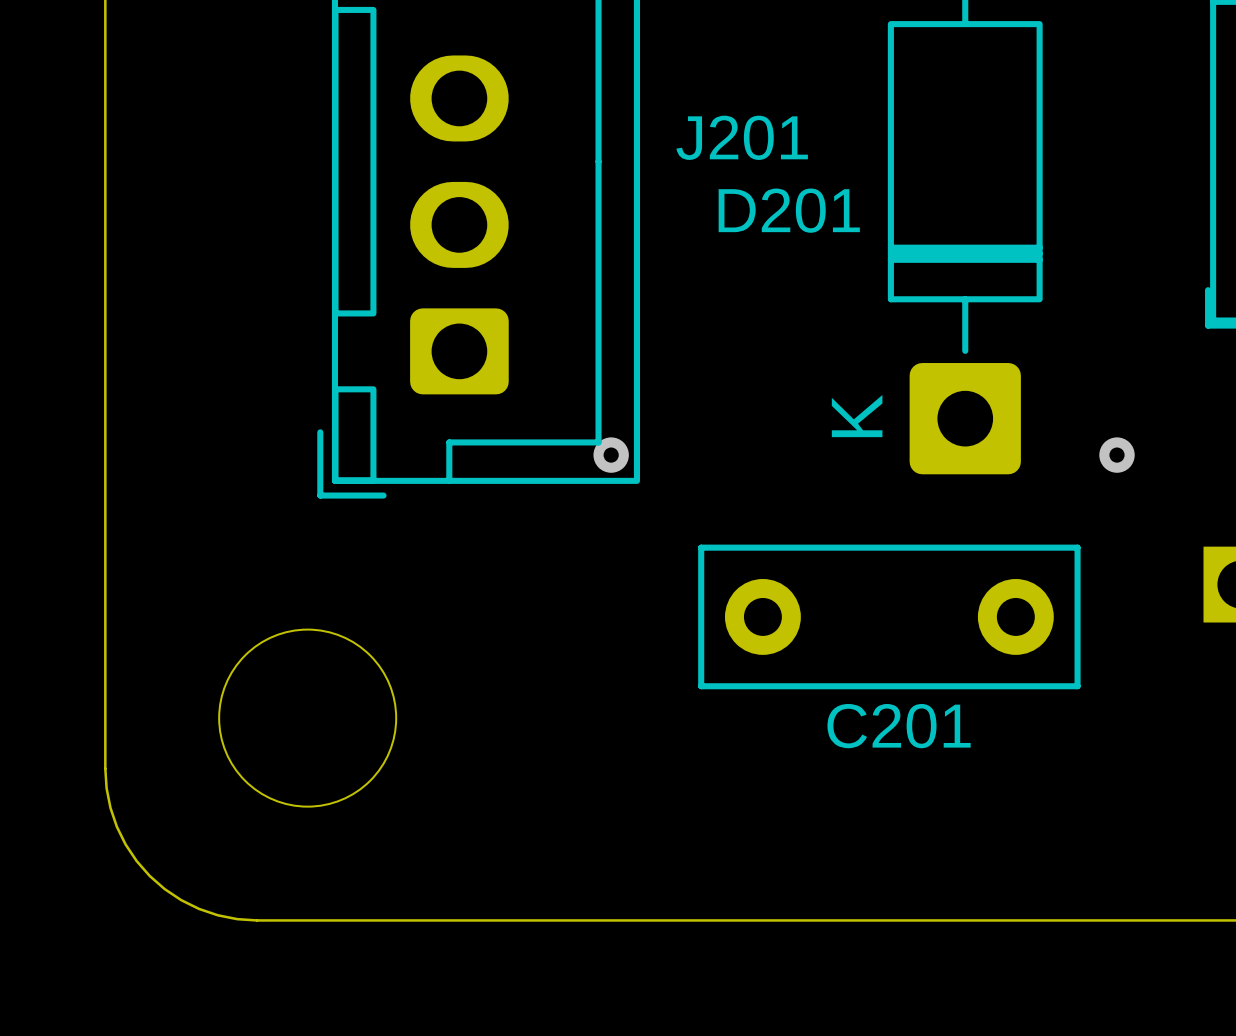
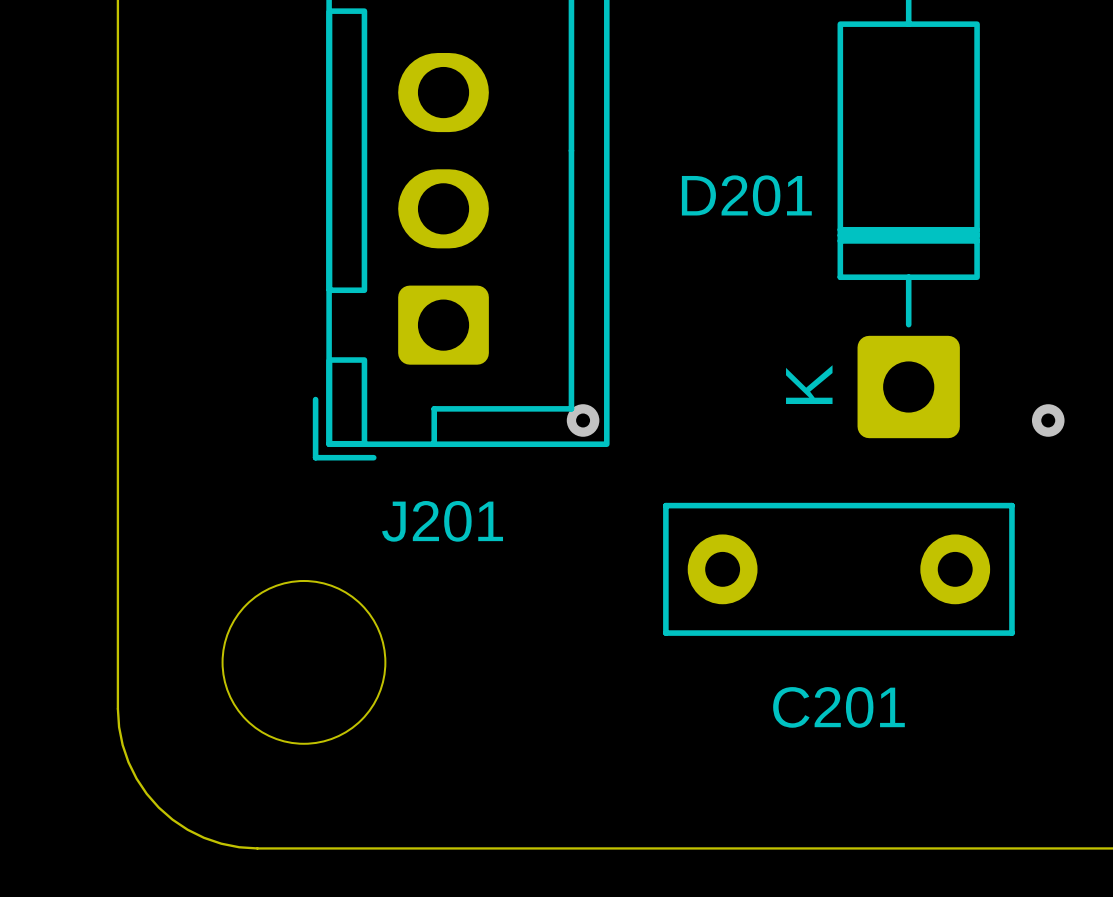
J201 name position: J201 (742, 137) -> J201 (442, 521)
C201 name position: C201 (899, 726) -> C201 (838, 707)

